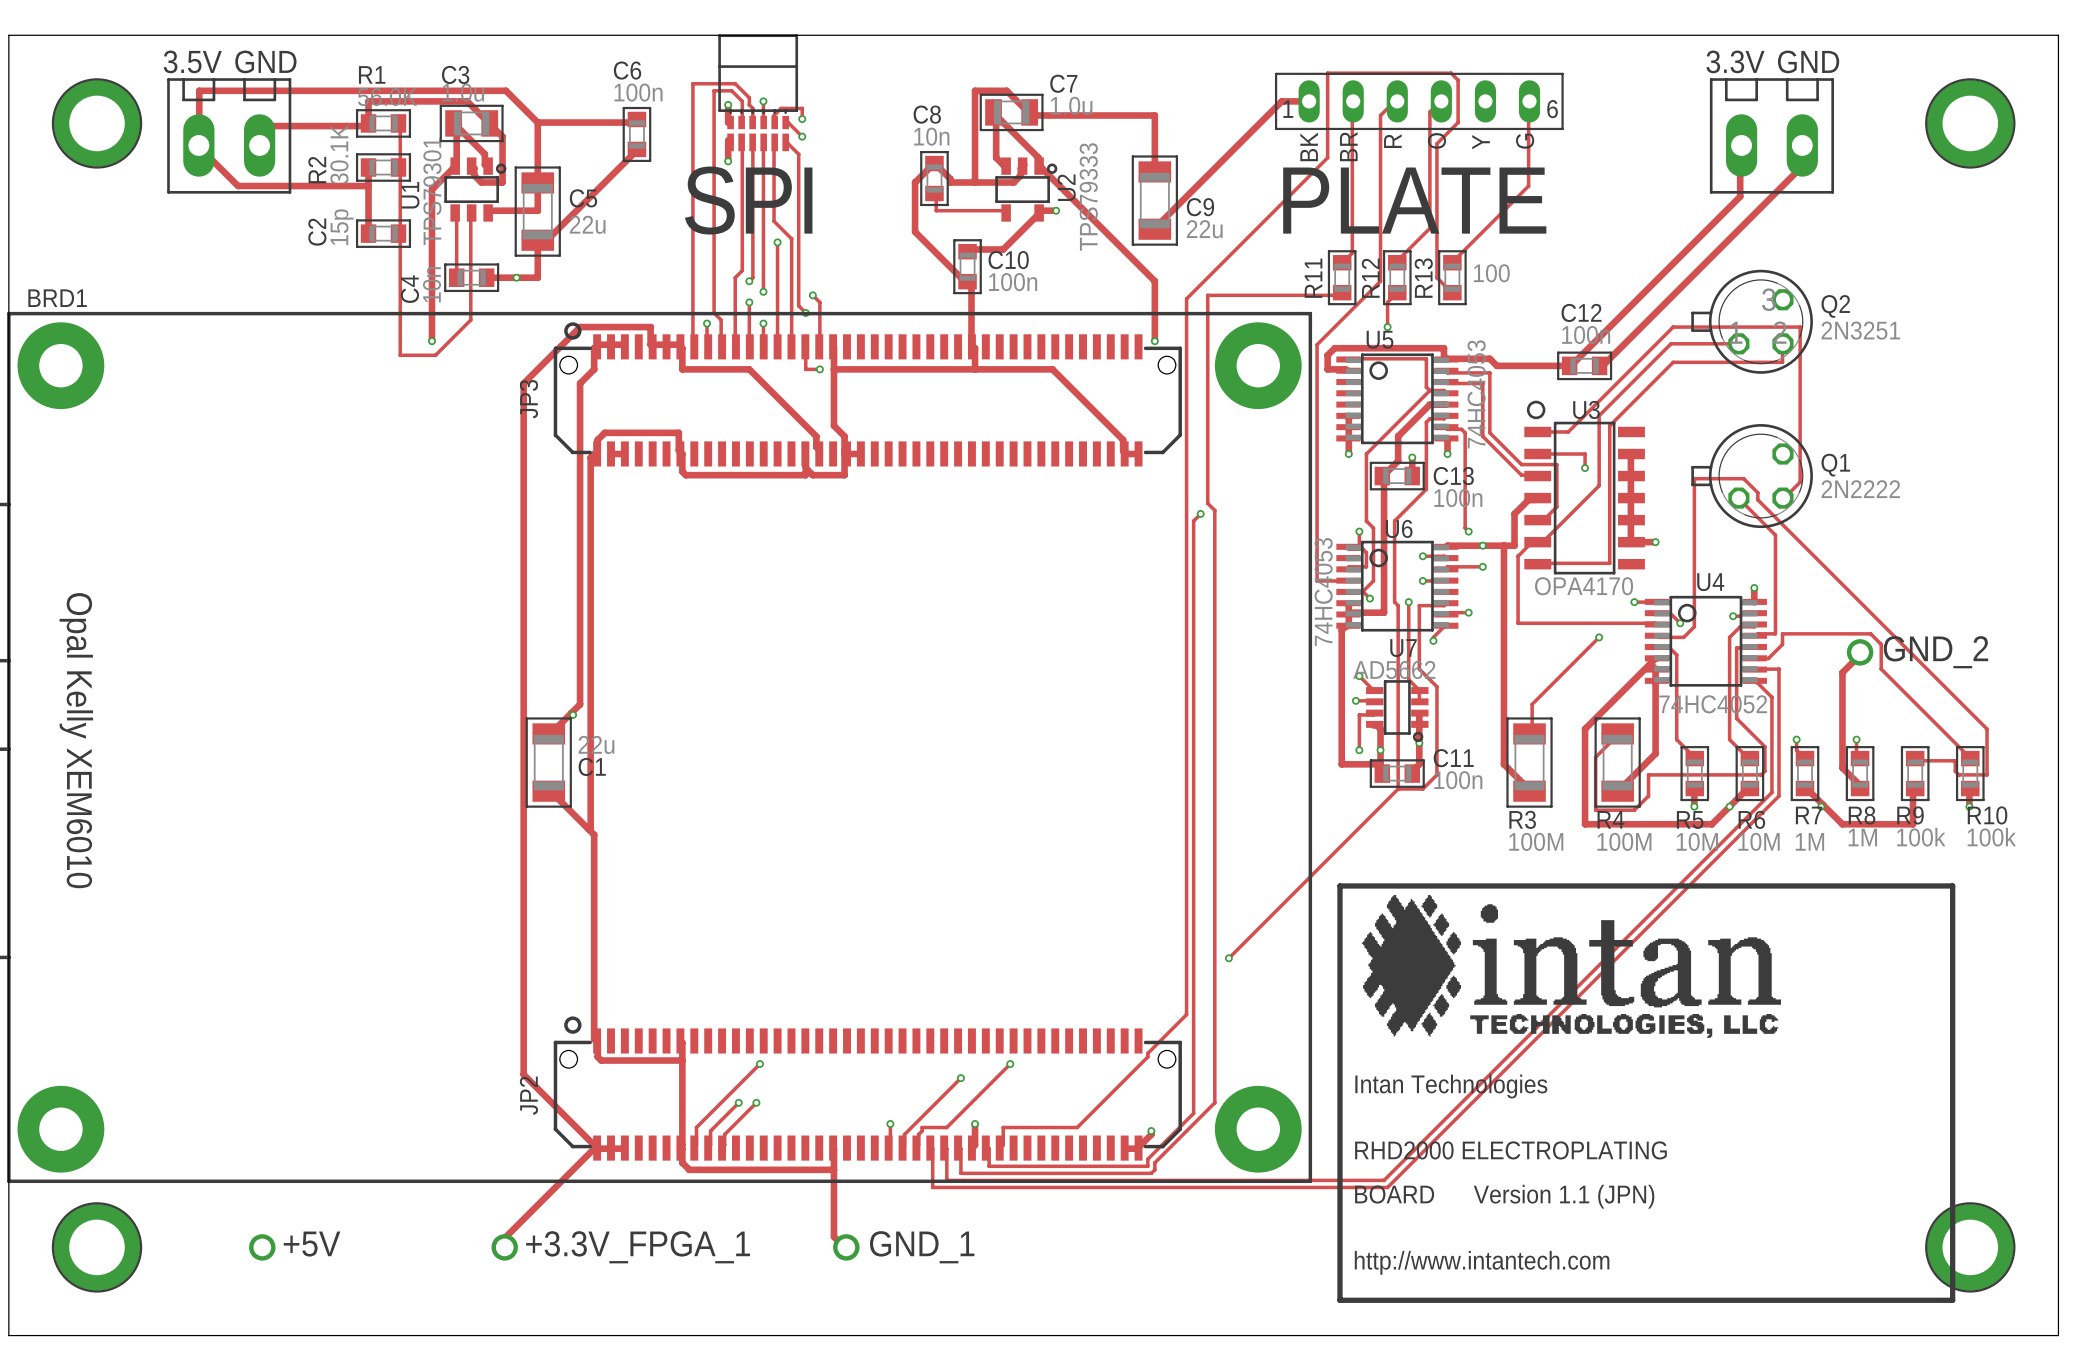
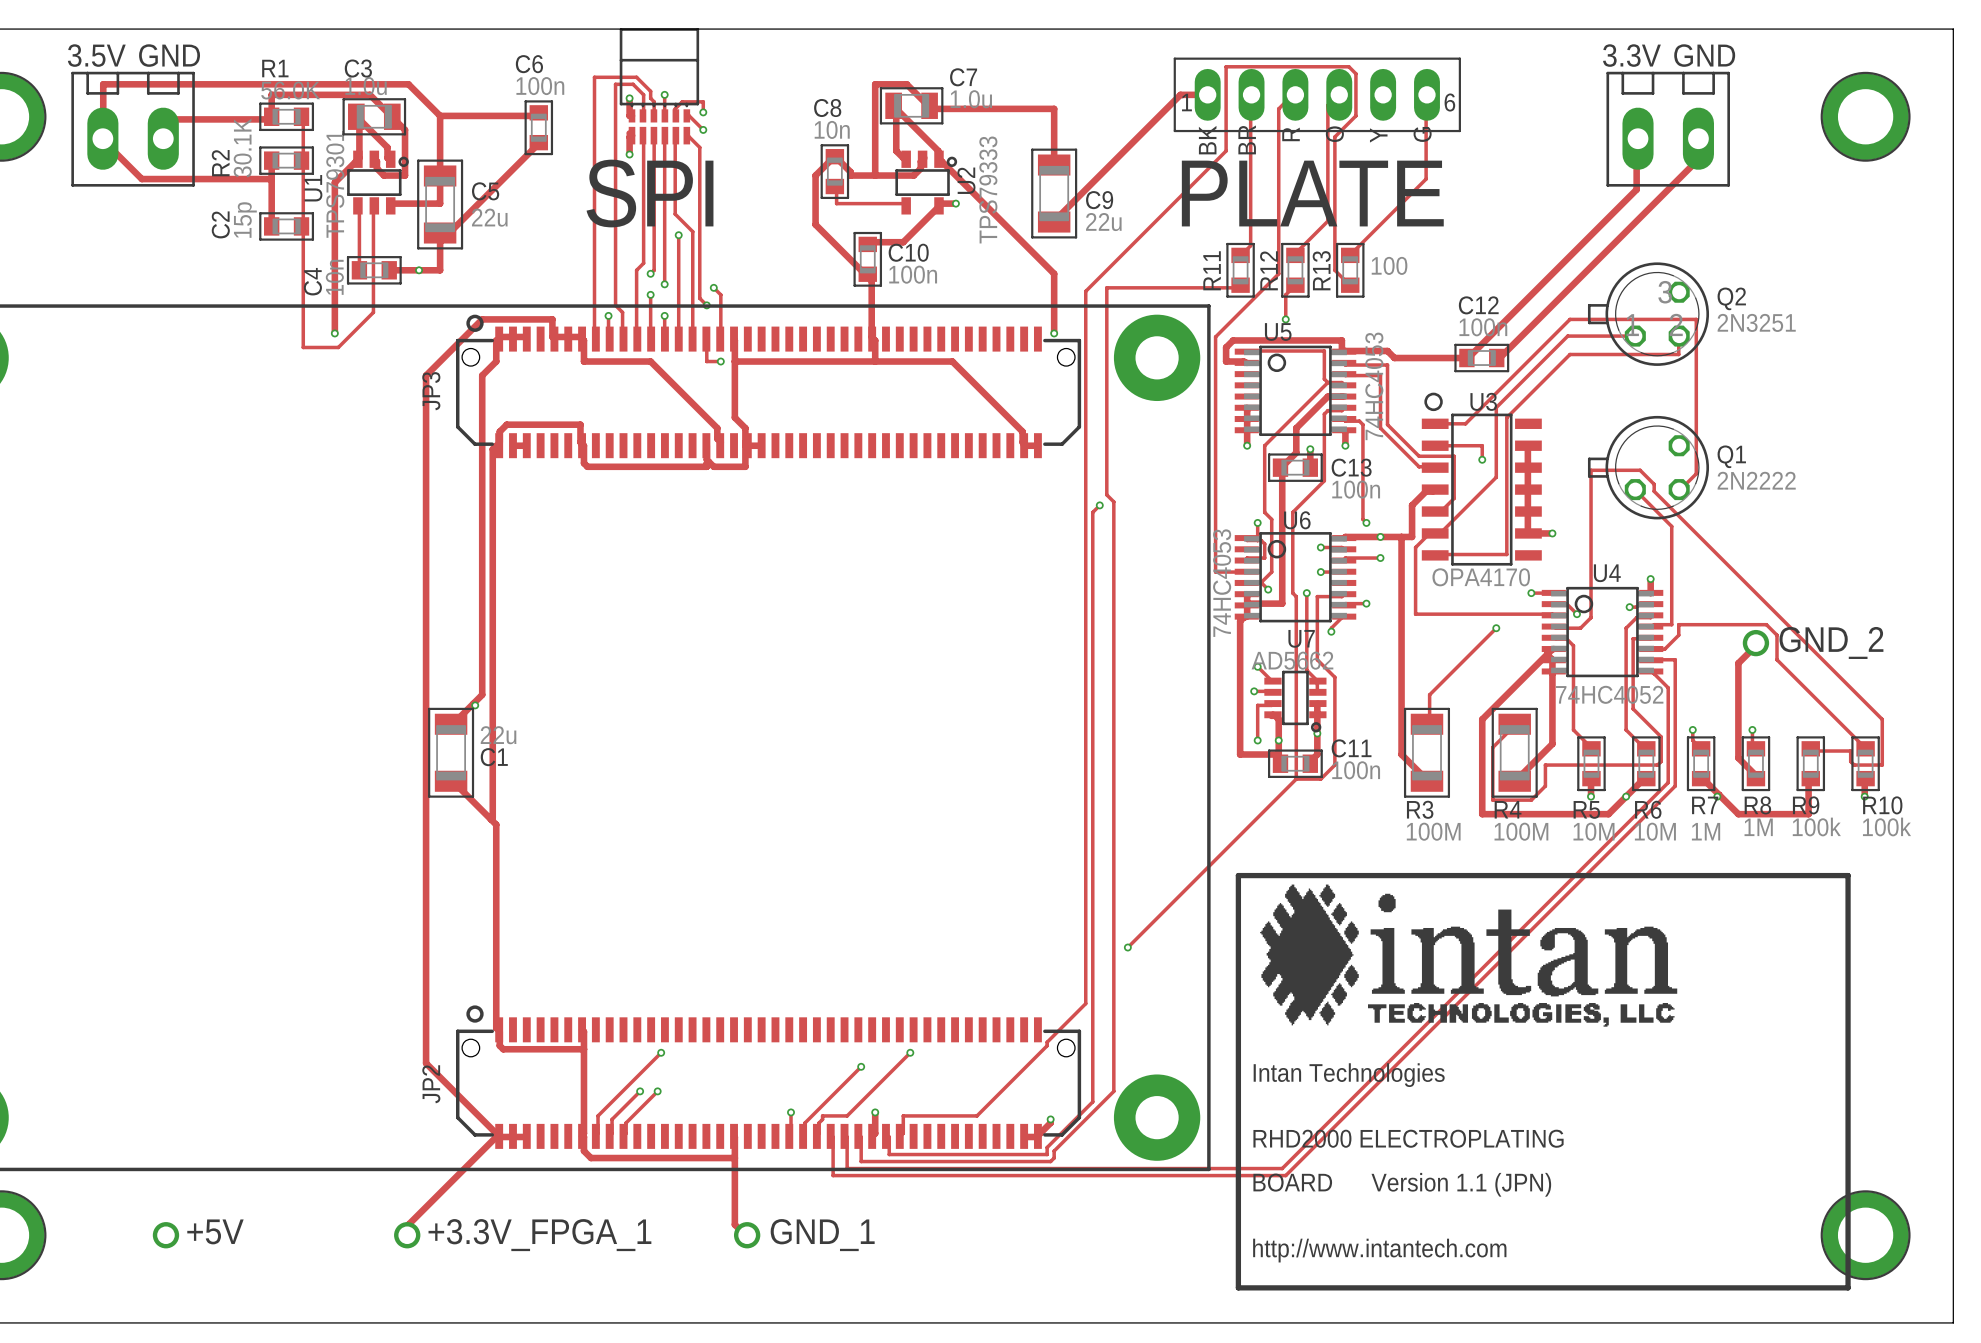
part footprint: [1274, 72, 1564, 131] -> [1173, 57, 1461, 133]

